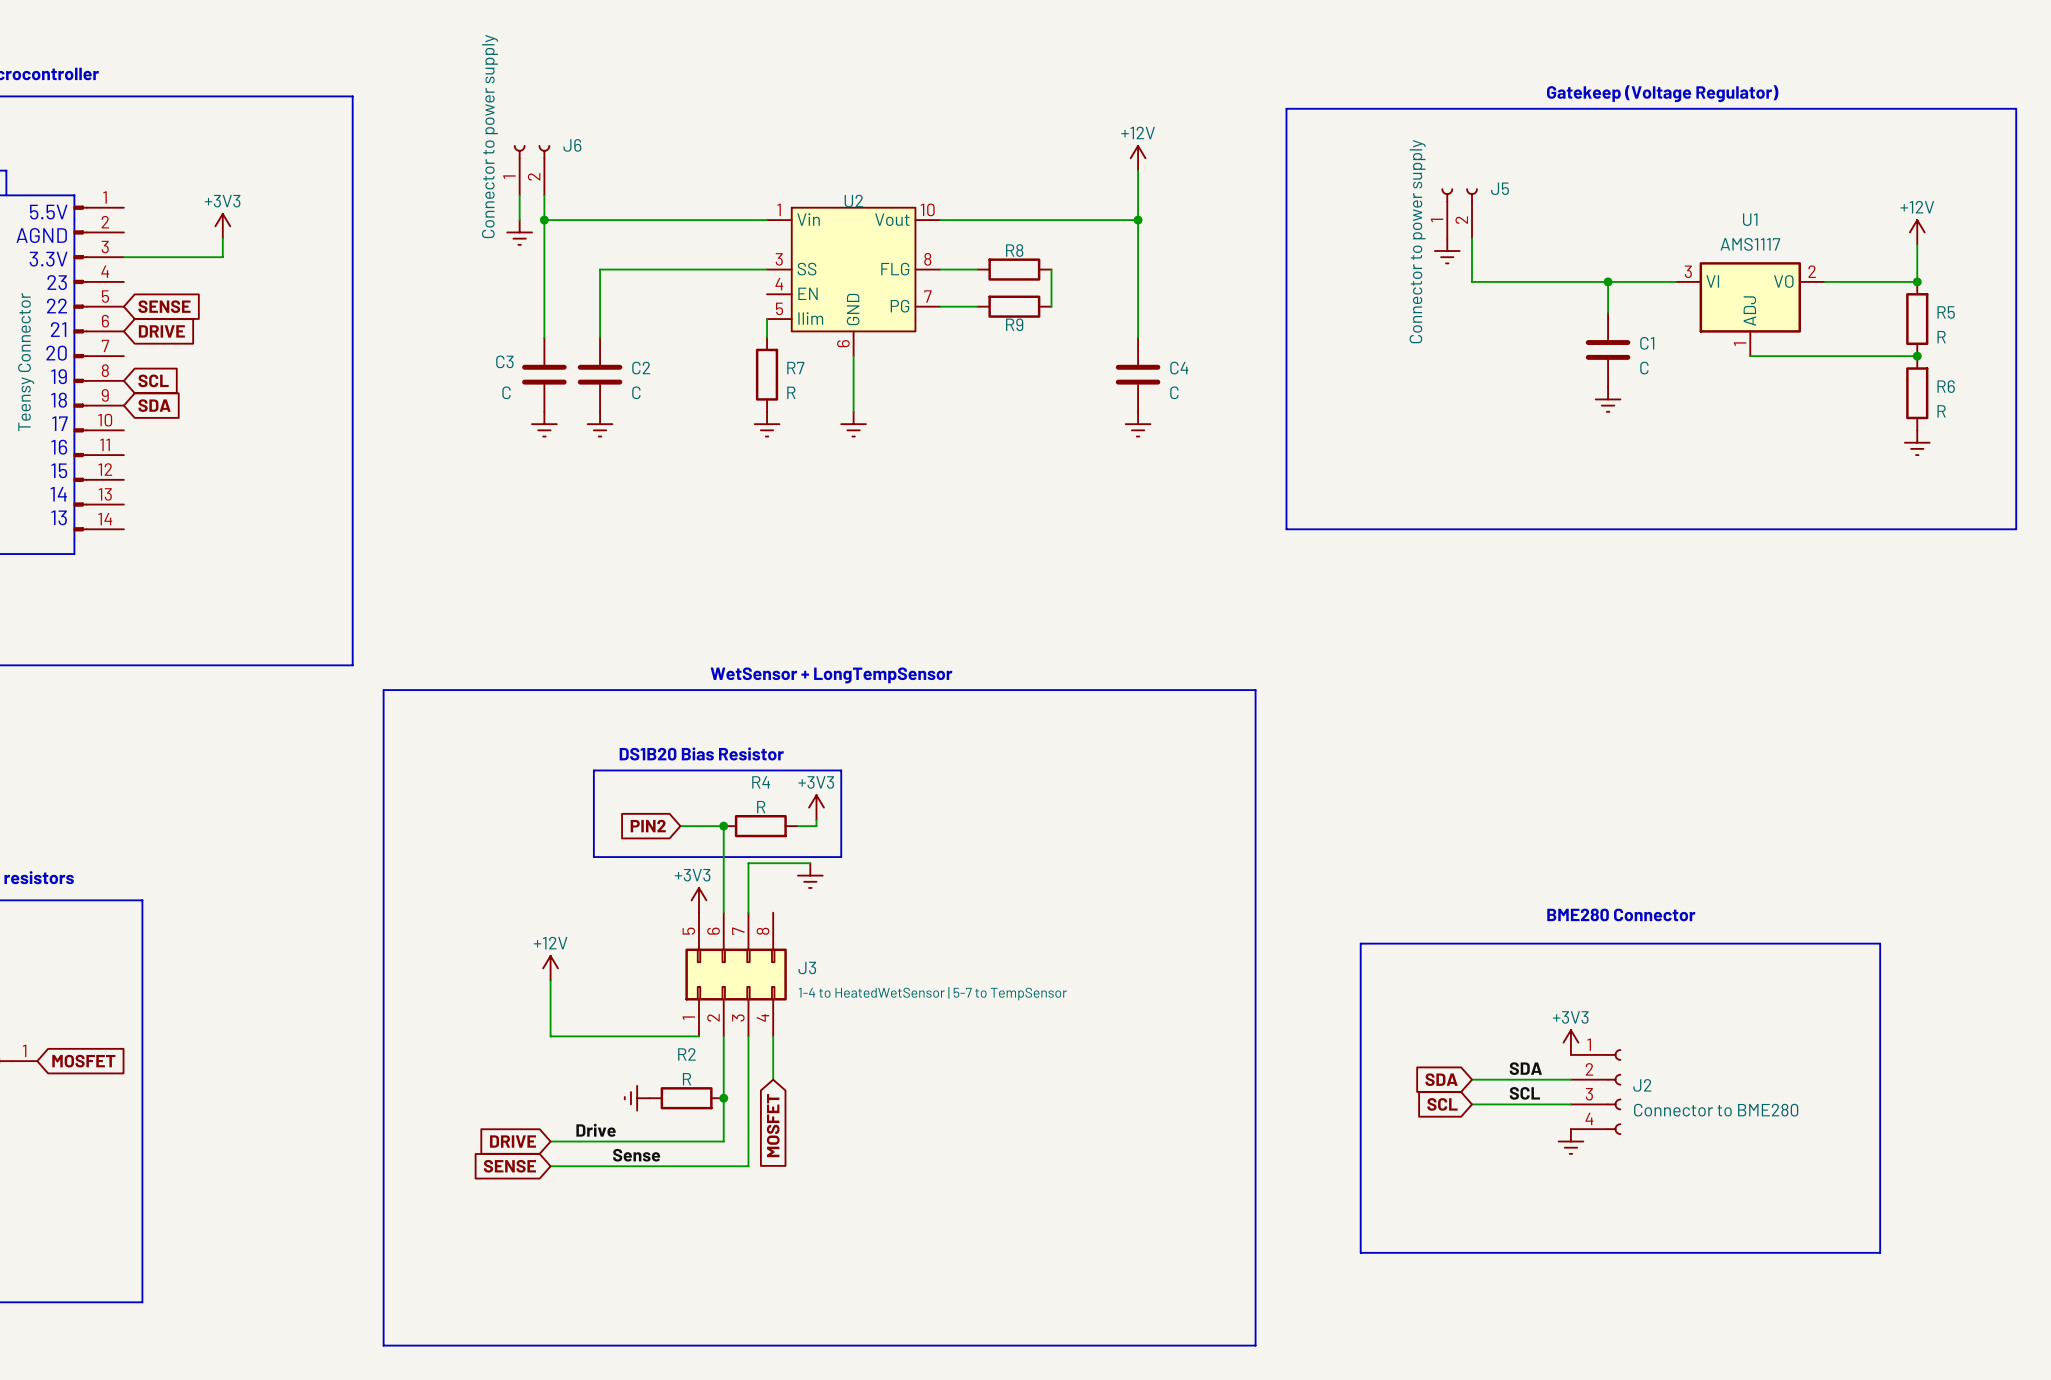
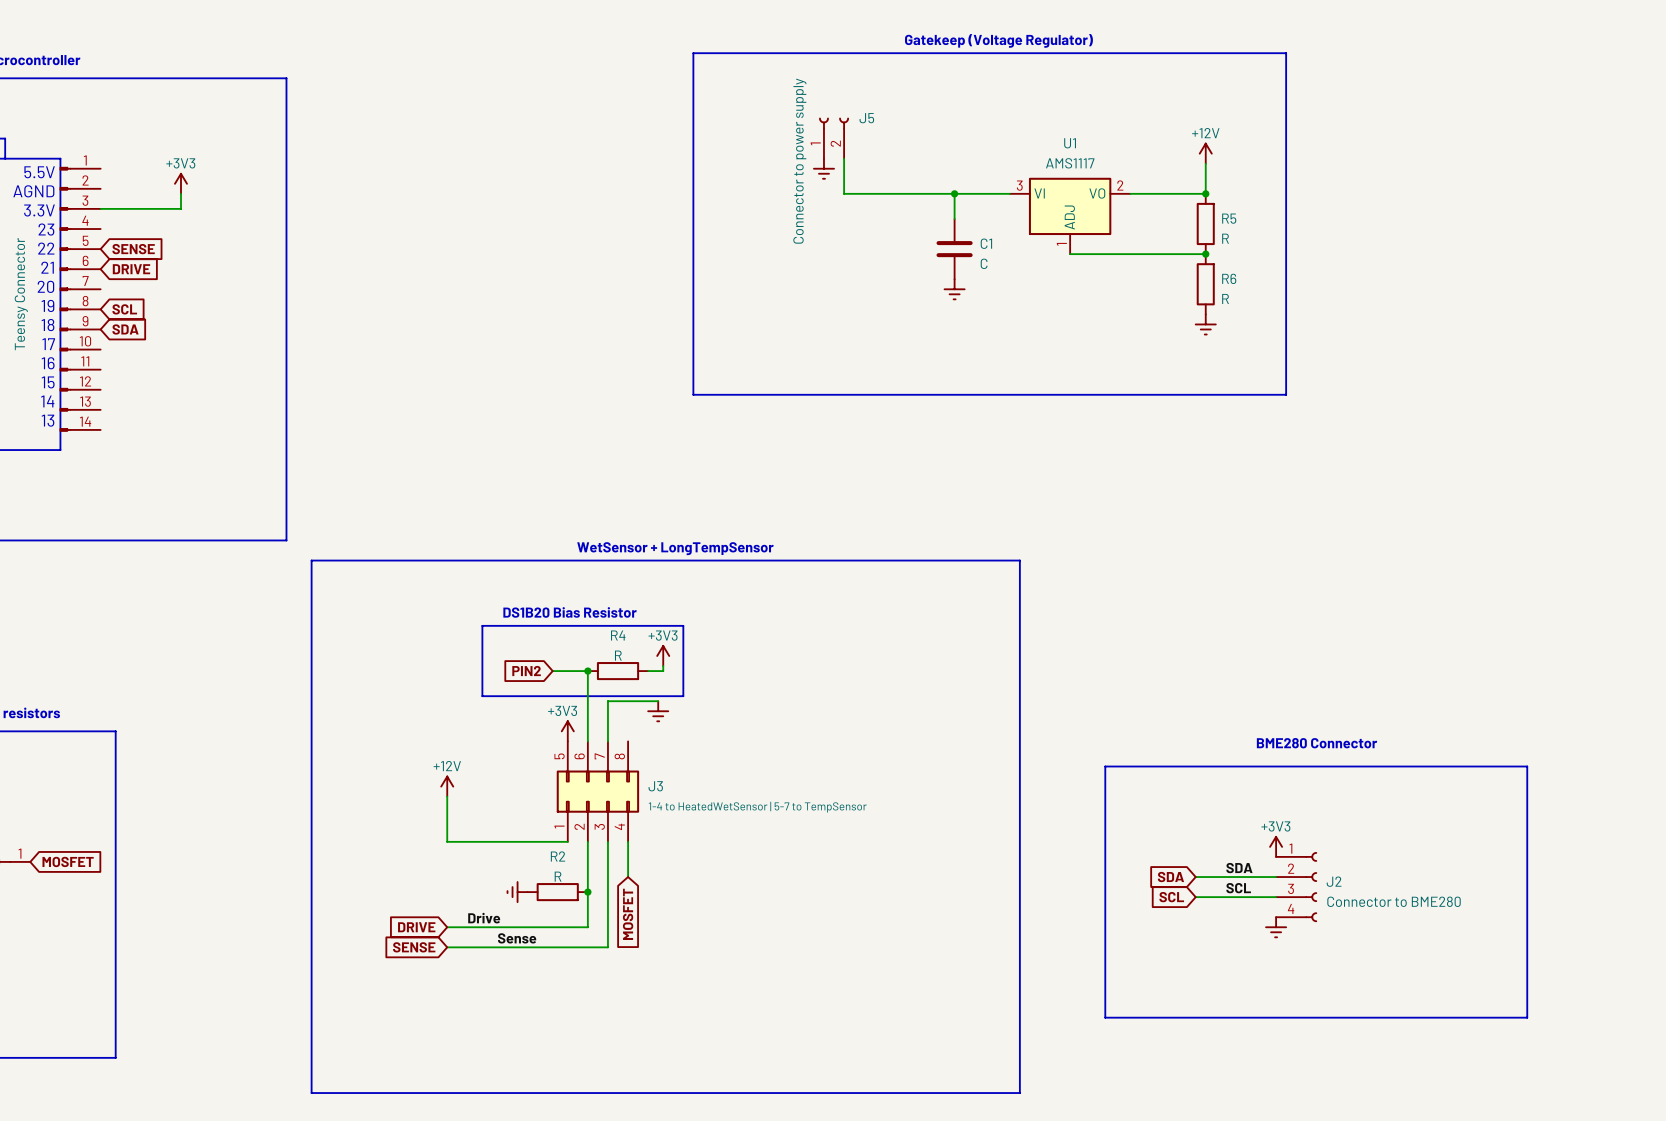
text: none -> Gatekeep (Voltage Regulator) (998, 40)
line: none -> (693, 53) (1286, 53) (1286, 394) (693, 394) (693, 53)
text: Gatekeep (Voltage Regulator) (1662, 93) -> none
line: (1286, 108) (2016, 108) (2016, 529) (1286, 529) (1286, 108) -> none
power symbol: +12V (1138, 158) -> none
J6: Connector to power supply (532, 170) -> none
wire: (1138, 170) (1138, 337) -> none
power symbol: none -> +12V (1205, 153)
wire: (519, 195) (519, 220) -> none
wire: (544, 195) (544, 337) -> none
wire: none -> (844, 158) (844, 193) (1009, 193)
wire: none -> (1205, 163) (1205, 193) (1130, 193)
power symbol: none -> (823, 168)
J5 position: (1459, 213) -> (834, 138)
wire: (544, 220) (767, 220) -> none
junction: (544, 220) -> none
wire: (940, 220) (1138, 220) -> none
junction position: (1138, 220) -> (954, 193)
power symbol: (519, 232) -> none
power symbol: +12V (1917, 232) -> none
wire: none -> (954, 193) (954, 218)
wire: (1472, 238) (1472, 281) (1676, 281) -> none
junction: none -> (1205, 193)
wire: (1917, 244) (1917, 281) (1824, 281) -> none
power symbol: (1447, 251) -> none
wire: (767, 269) (600, 269) (600, 337) -> none
wire: (940, 269) (977, 269) -> none
R8: (1014, 269) -> none
wire: (1051, 269) (1051, 306) -> none
U2: (853, 281) -> none
wire: (1608, 281) (1608, 312) -> none
junction: (1608, 281) -> none
junction: (1917, 281) -> none
wire: (940, 306) (977, 306) -> none
R9: (1014, 306) -> none
U1 position: (1750, 309) -> (1070, 215)
wire: none -> (1070, 254) (1205, 254)
junction: none -> (1205, 254)
wire: (767, 319) (767, 337) -> none
R5 position: (1917, 319) -> (1205, 223)
C1 position: (1608, 349) -> (954, 249)
wire: (1750, 356) (1917, 356) -> none
junction: (1917, 356) -> none
C3: C (544, 374) -> none
C2: C (600, 374) -> none
R7: R (767, 374) -> none
C4: C (1138, 374) -> none
R6 position: (1917, 393) -> (1205, 284)
power symbol: none -> (1205, 324)
power symbol: (1608, 399) -> none
power symbol: (544, 424) -> none
power symbol: (600, 424) -> none
power symbol: (767, 424) -> none
power symbol: (853, 424) -> none
power symbol position: (1138, 424) -> (954, 289)
power symbol: (1917, 442) -> none

